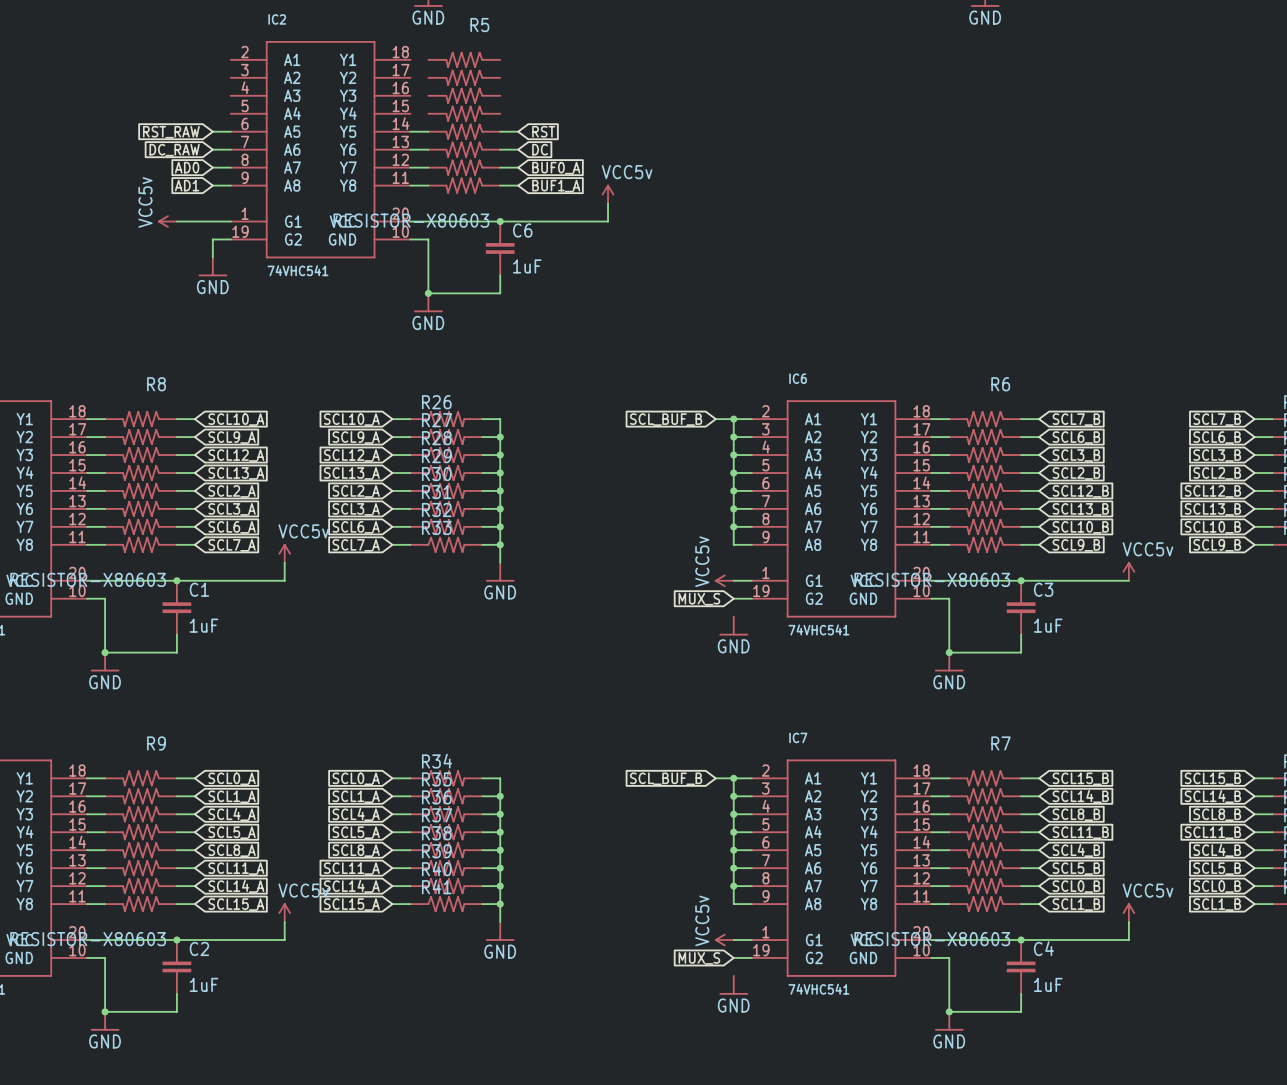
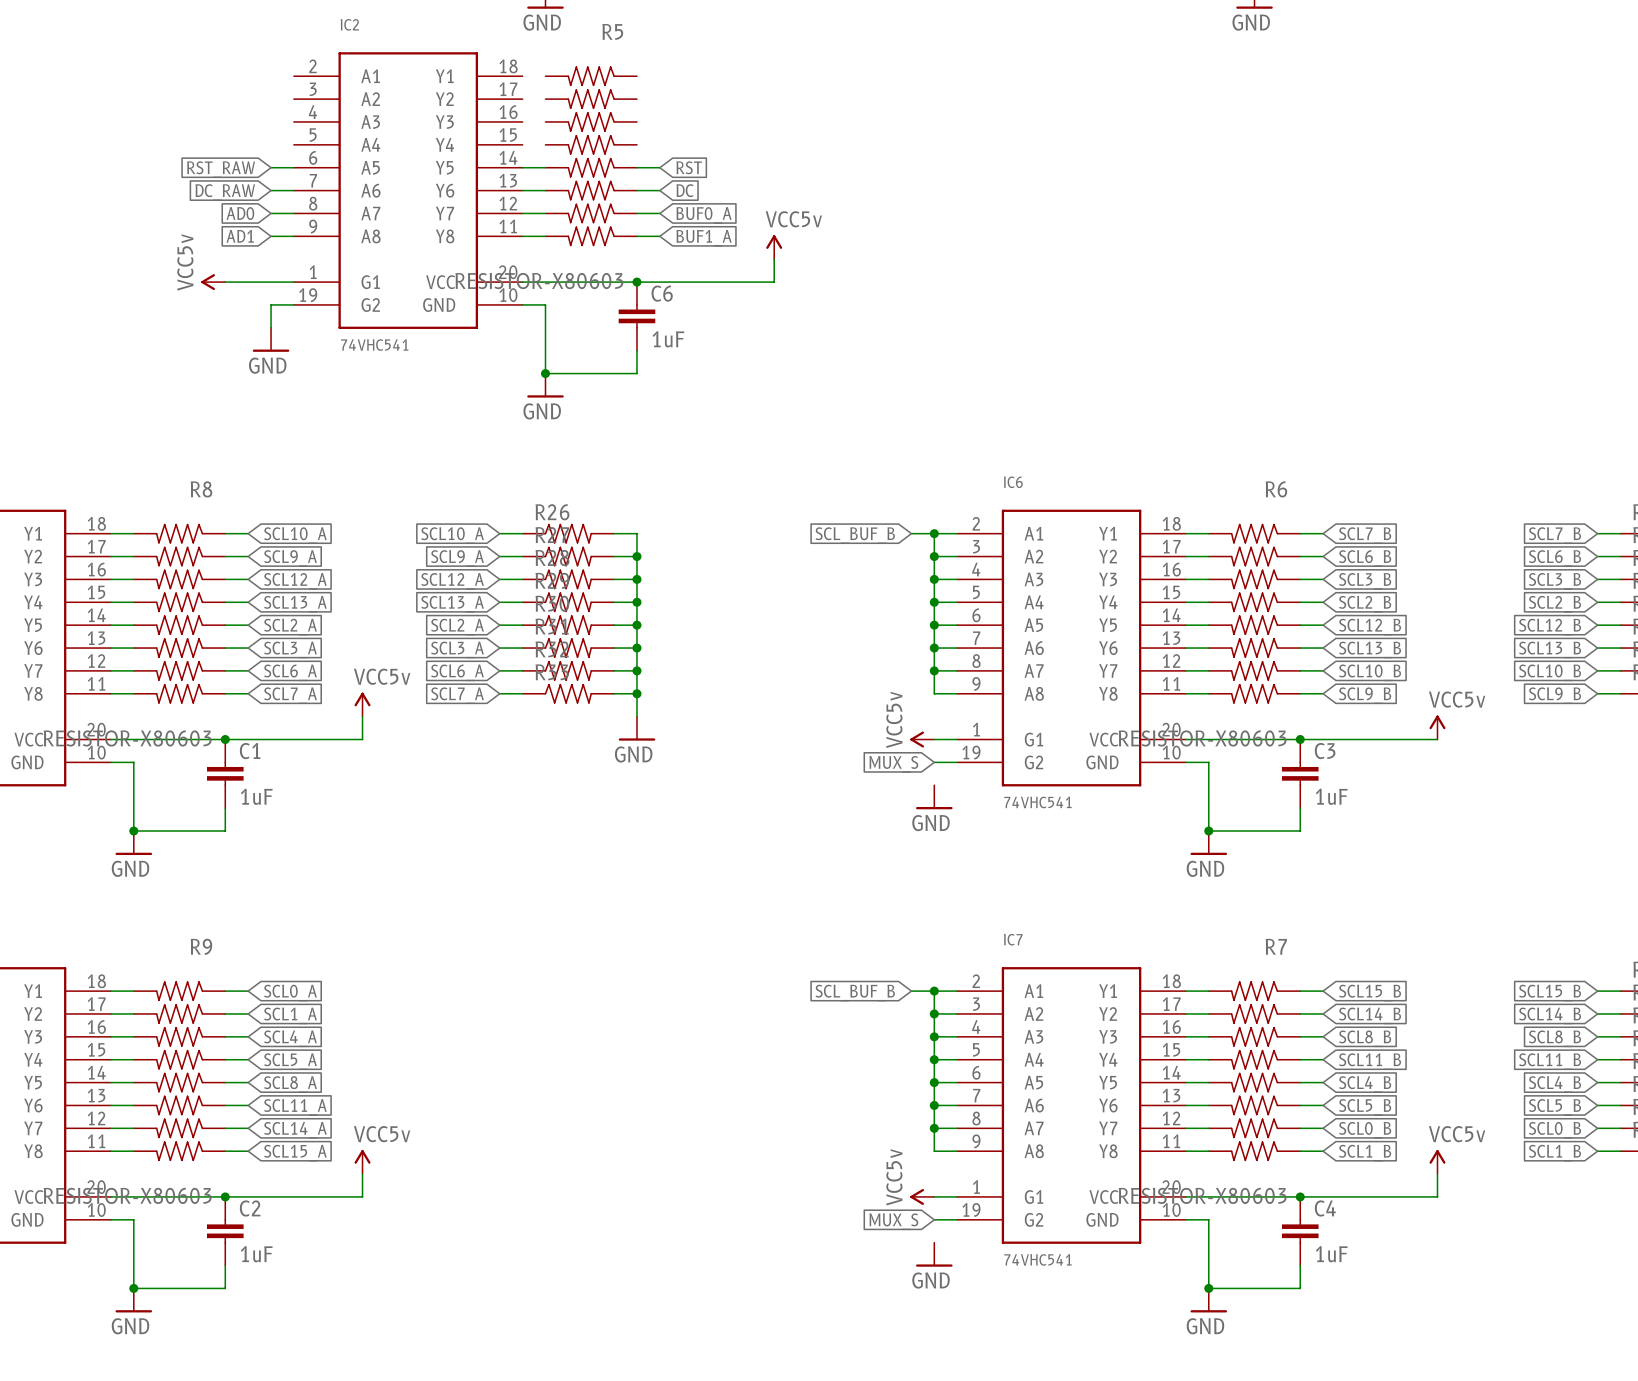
global label: SCL0_A (356, 778) -> none
wire: (392, 778) (410, 778) -> none
R34: (446, 778) -> none
wire: (482, 778) (500, 778) (500, 922) -> none
global label: SCL1_A (356, 796) -> none
wire: (392, 796) (410, 796) -> none
R35: (446, 796) -> none
wire: (482, 796) (500, 796) -> none
junction: (500, 796) -> none
global label: SCL4_A (356, 814) -> none
wire: (392, 814) (410, 814) -> none
R36: (446, 814) -> none
wire: (482, 814) (500, 814) -> none
junction: (500, 814) -> none
global label: SCL5_A (356, 832) -> none
wire: (392, 832) (410, 832) -> none
R37: (446, 832) -> none
wire: (482, 832) (500, 832) -> none
junction: (500, 832) -> none
global label: SCL8_A (356, 850) -> none
wire: (392, 850) (410, 850) -> none
R38: (446, 850) -> none
wire: (482, 850) (500, 850) -> none
junction: (500, 850) -> none
global label: SCL11_A (351, 868) -> none
wire: (392, 868) (410, 868) -> none
R39: (446, 868) -> none
wire: (482, 868) (500, 868) -> none
junction: (500, 868) -> none
global label: SCL14_A (351, 886) -> none
wire: (392, 886) (410, 886) -> none
R40: (446, 886) -> none
wire: (482, 886) (500, 886) -> none
junction: (500, 886) -> none
global label: SCL15_A (351, 904) -> none
wire: (392, 904) (410, 904) -> none
R41: (446, 904) -> none
wire: (482, 904) (500, 904) -> none
junction: (500, 904) -> none
power symbol: GND (500, 931) -> none

